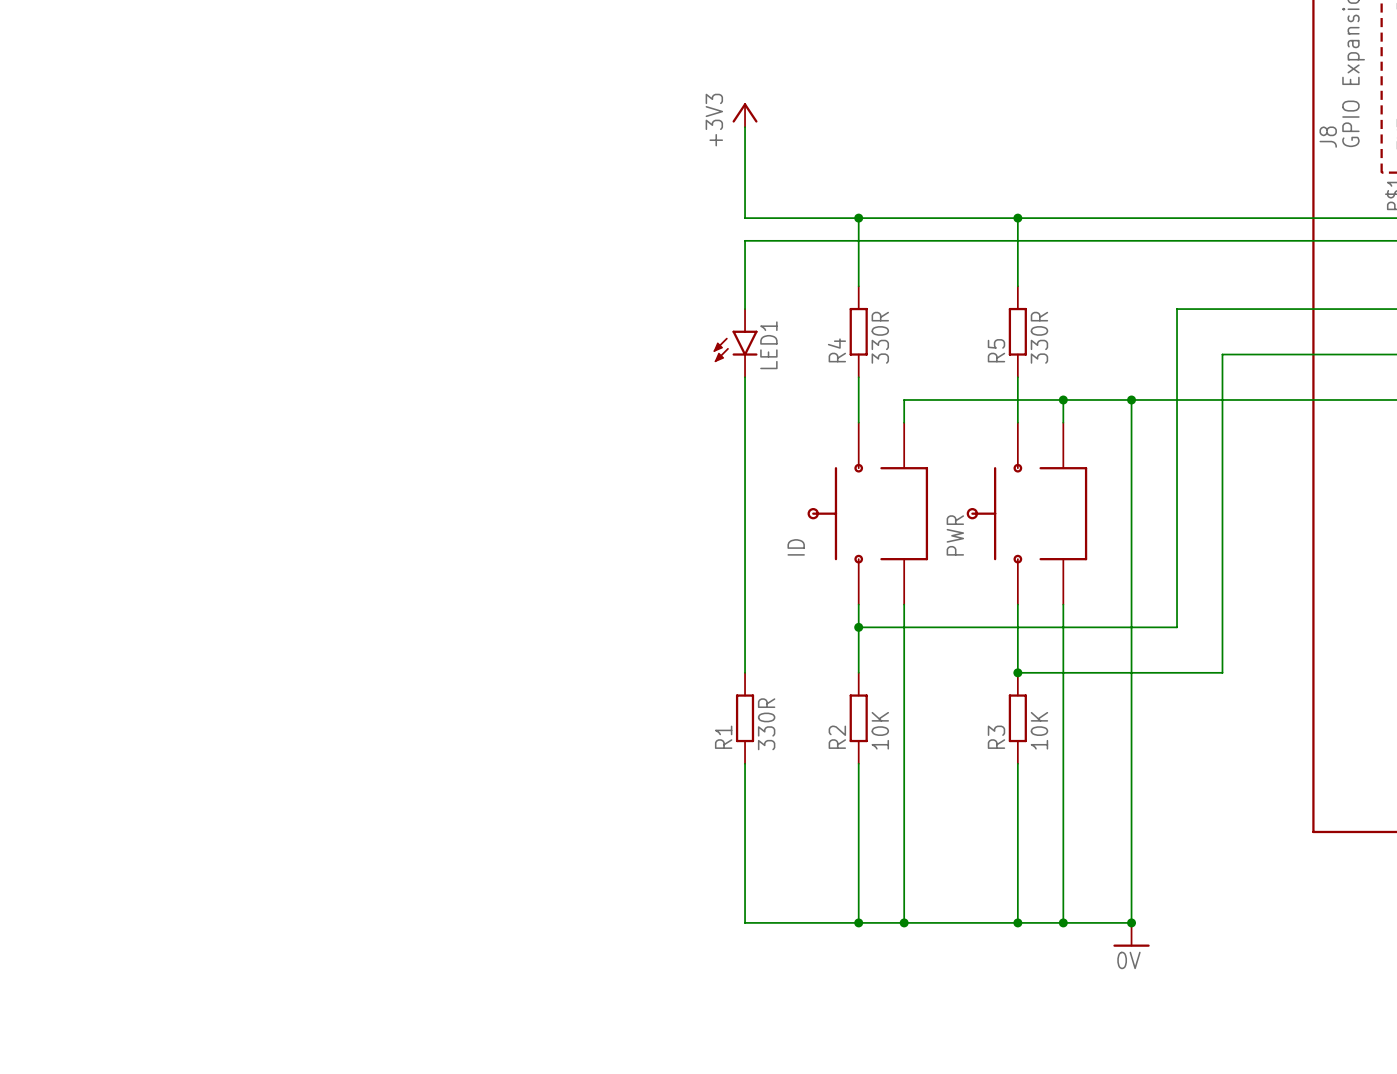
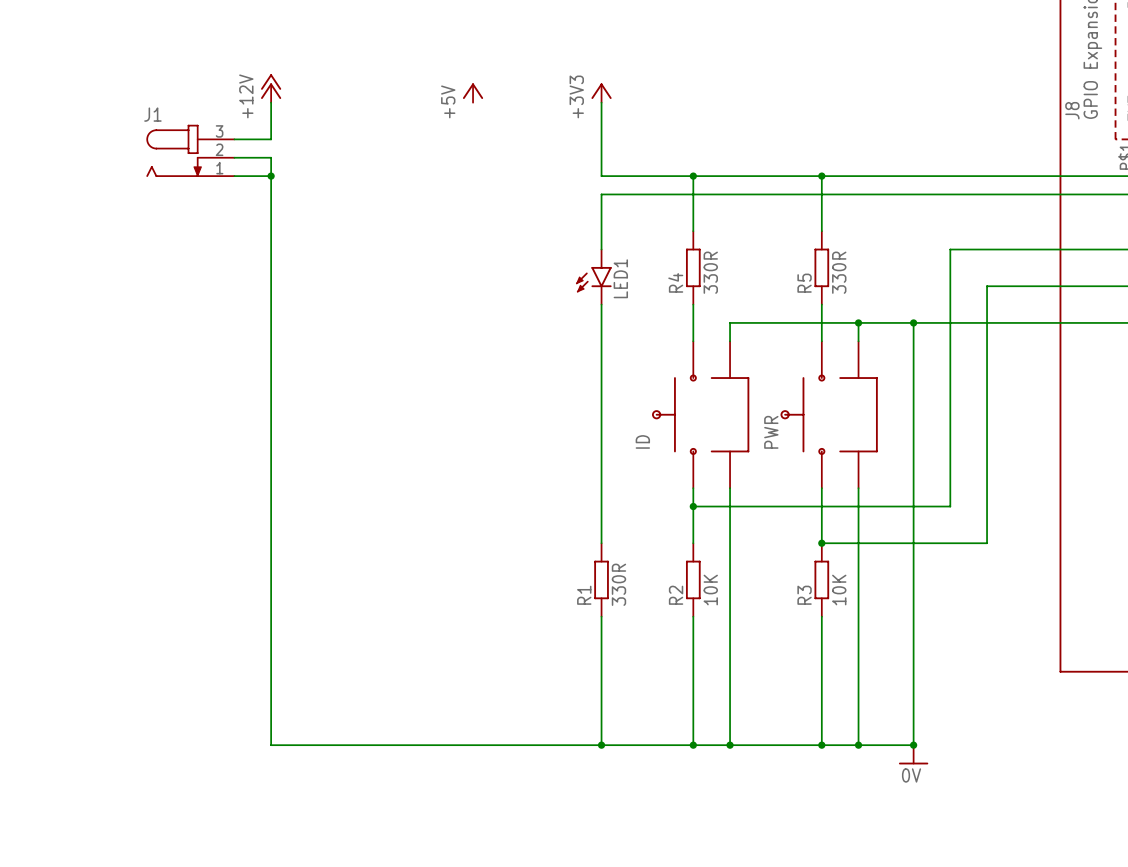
power symbol: none -> +12V (271, 88)
power symbol: none -> +5V (473, 93)
wire: none -> (271, 102) (271, 139) (234, 139)
J1: none -> (190, 150)
wire: none -> (234, 157) (271, 157) (271, 745) (601, 745)
wire: none -> (234, 176) (271, 176)
junction: none -> (271, 176)
junction: none -> (601, 745)

